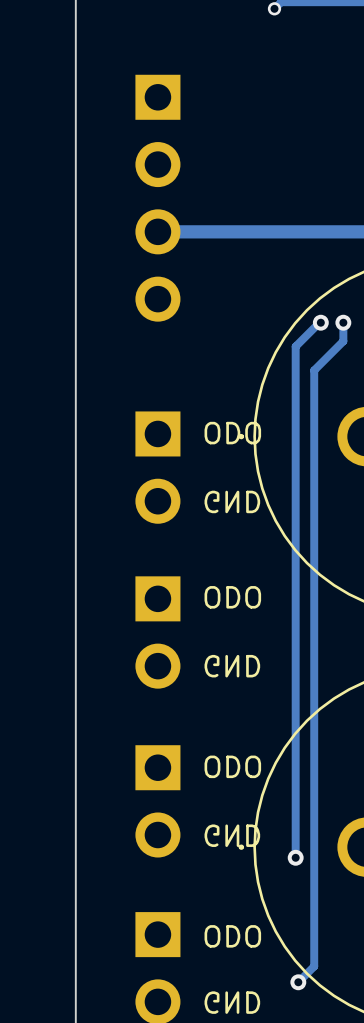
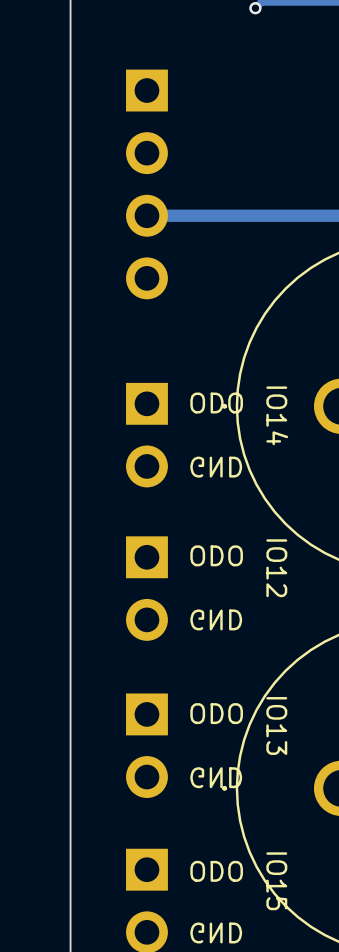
track: (320, 322) (295, 346) (295, 857) -> none
via: (320, 322) -> none
track: (343, 322) (343, 341) (314, 370) (314, 966) (298, 982) -> none
via: (343, 322) -> none
text: none -> IO14 (277, 415)
text: none -> IO12 (276, 568)
text: none -> IO13 (276, 725)
via: (295, 857) -> none
text: none -> IO15 (276, 881)
via: (298, 982) -> none

